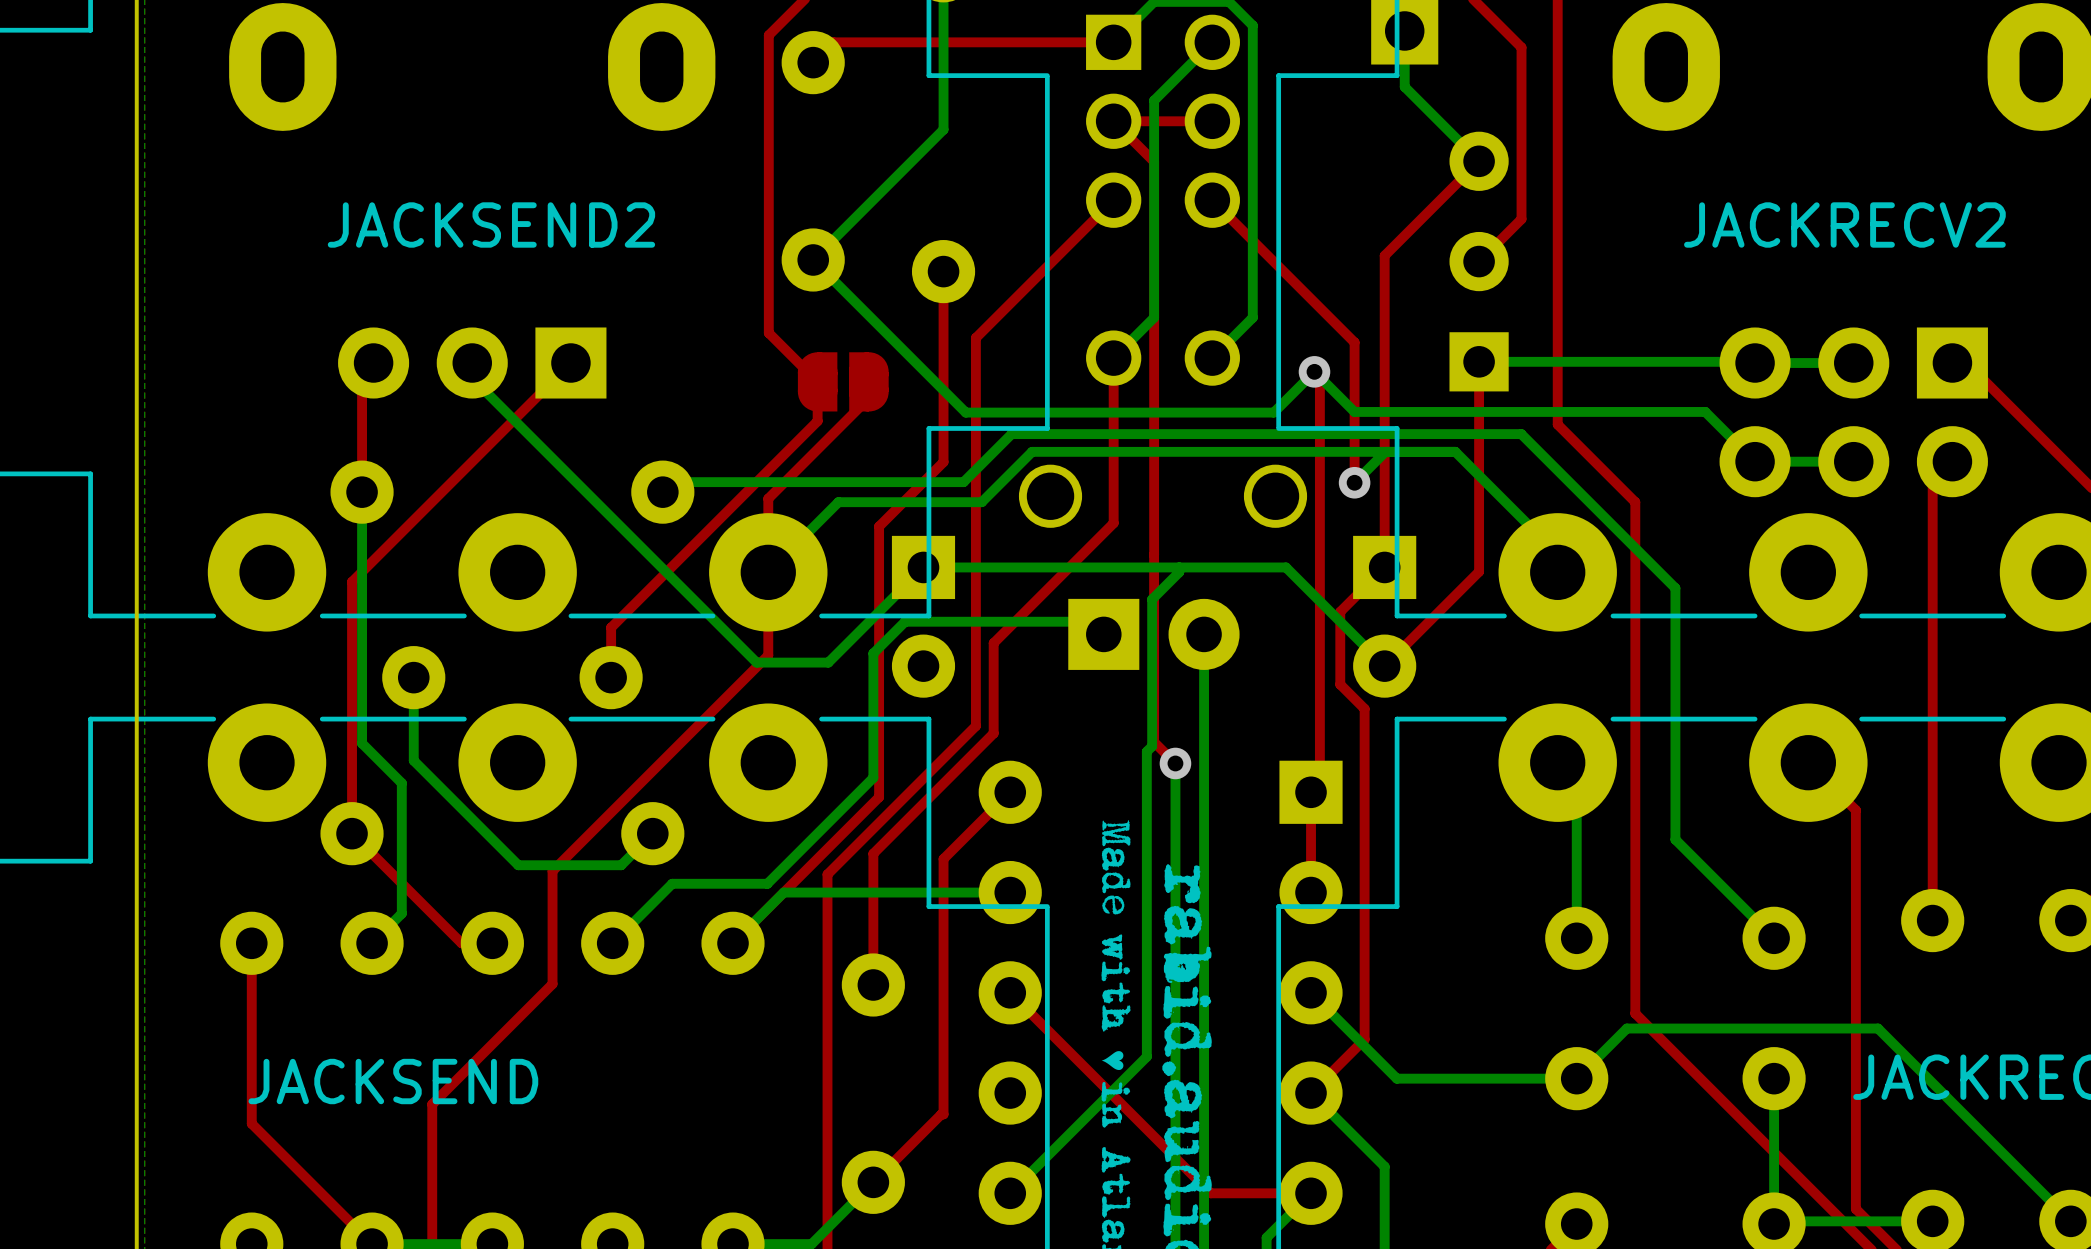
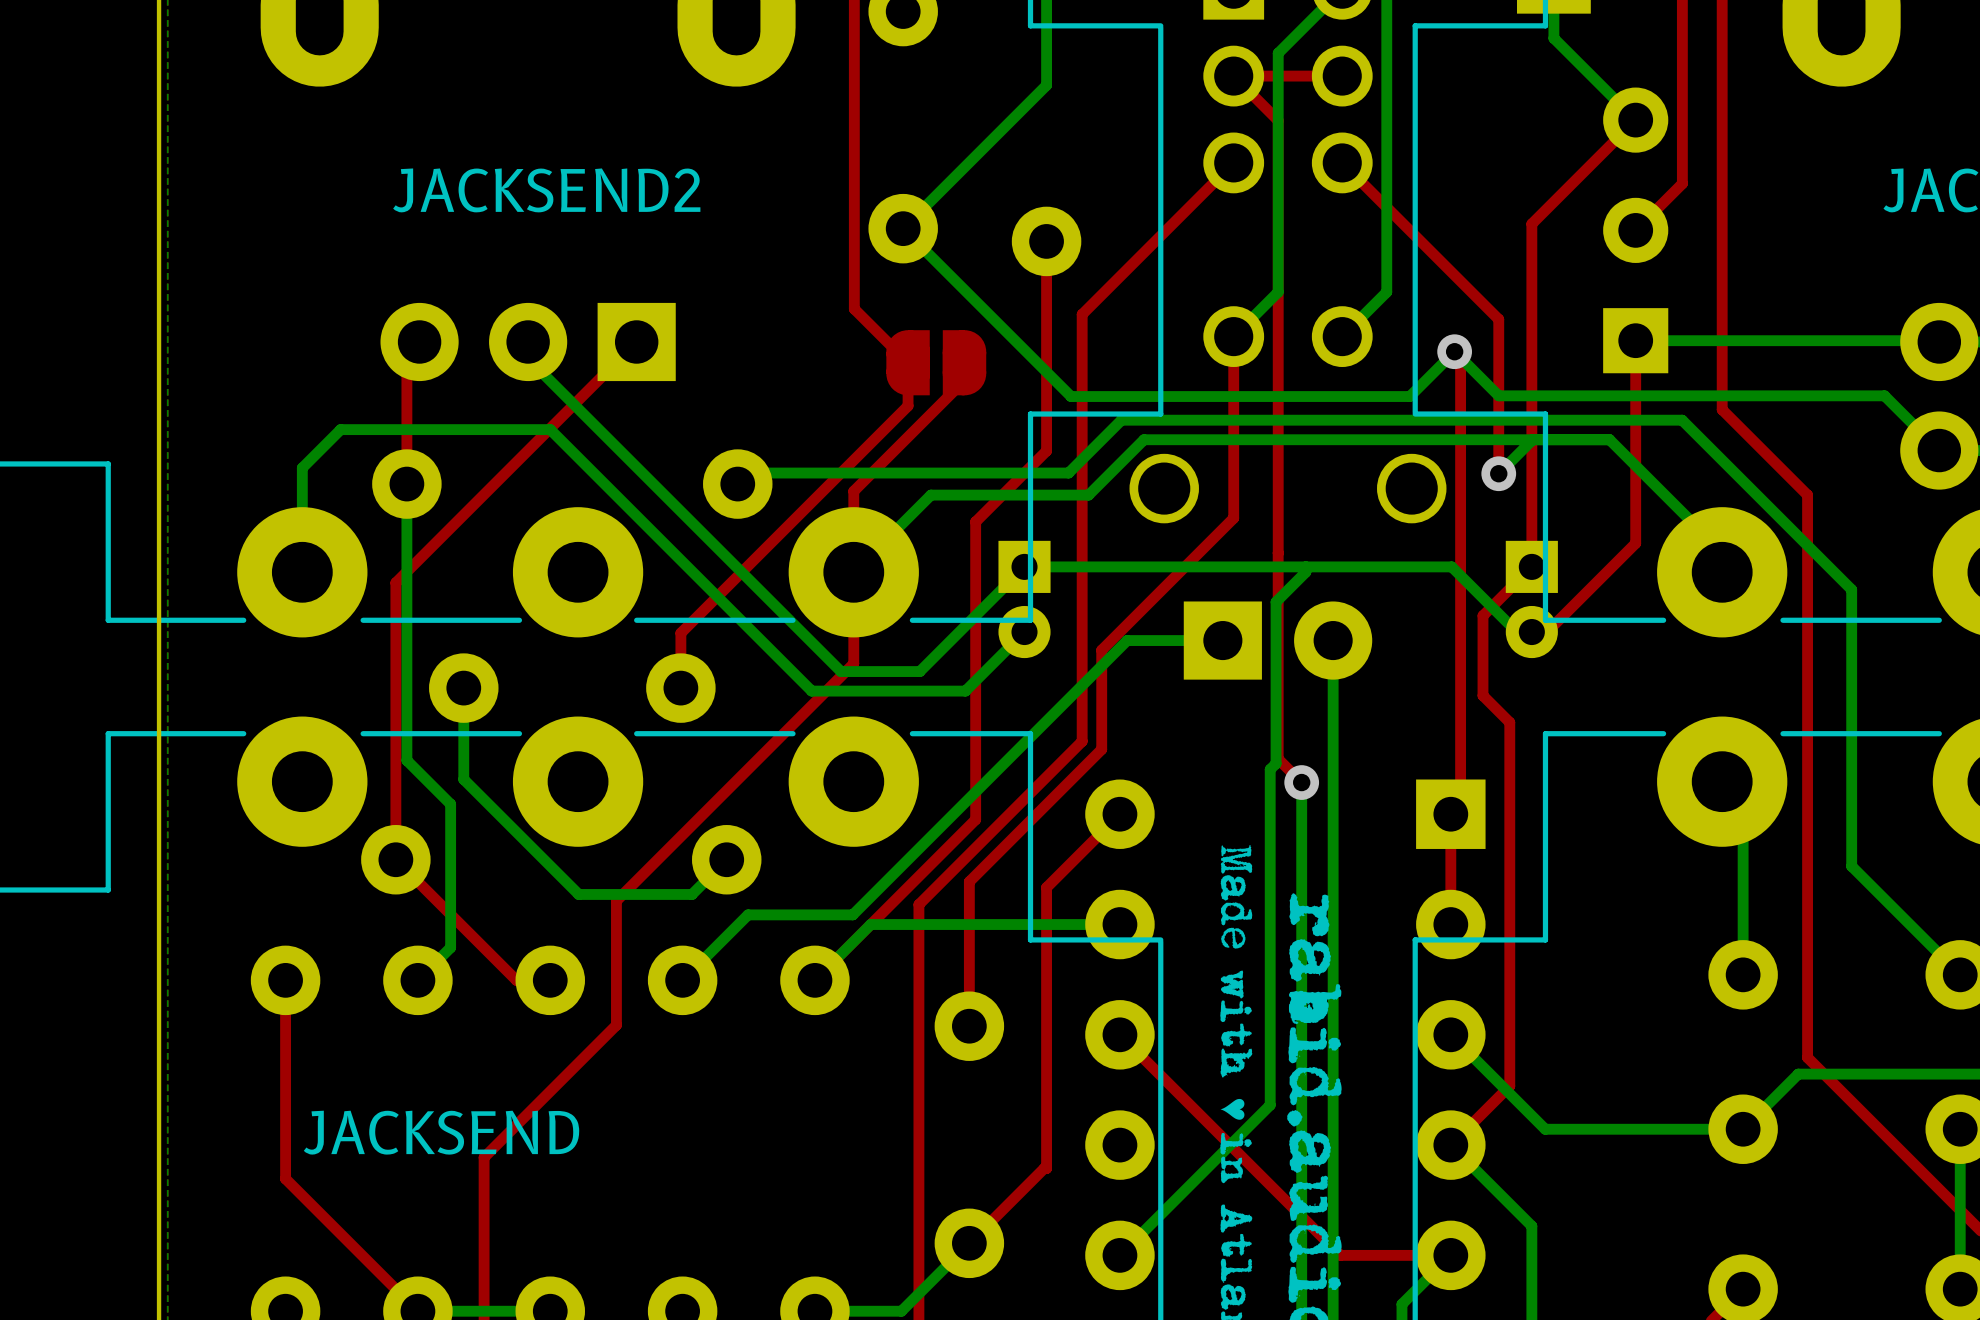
part footprint: [891, 535, 956, 698] -> [998, 540, 1051, 659]
part footprint: [1353, 535, 1417, 698] -> [1505, 540, 1558, 659]
top track: (1479, 546) (1479, 571) (1384, 666) -> (1635, 543) (1547, 632)
bottom track: (1286, 567) (1384, 666) -> (1423, 566) (1451, 566) (1516, 632)
bottom track: none -> (302, 572) (302, 467) (340, 429) (550, 429) (811, 691) (965, 691) (1024, 632)
bottom track: (1091, 621) (905, 621) (873, 653) (873, 777) -> (1222, 640) (1127, 640) (969, 798)

